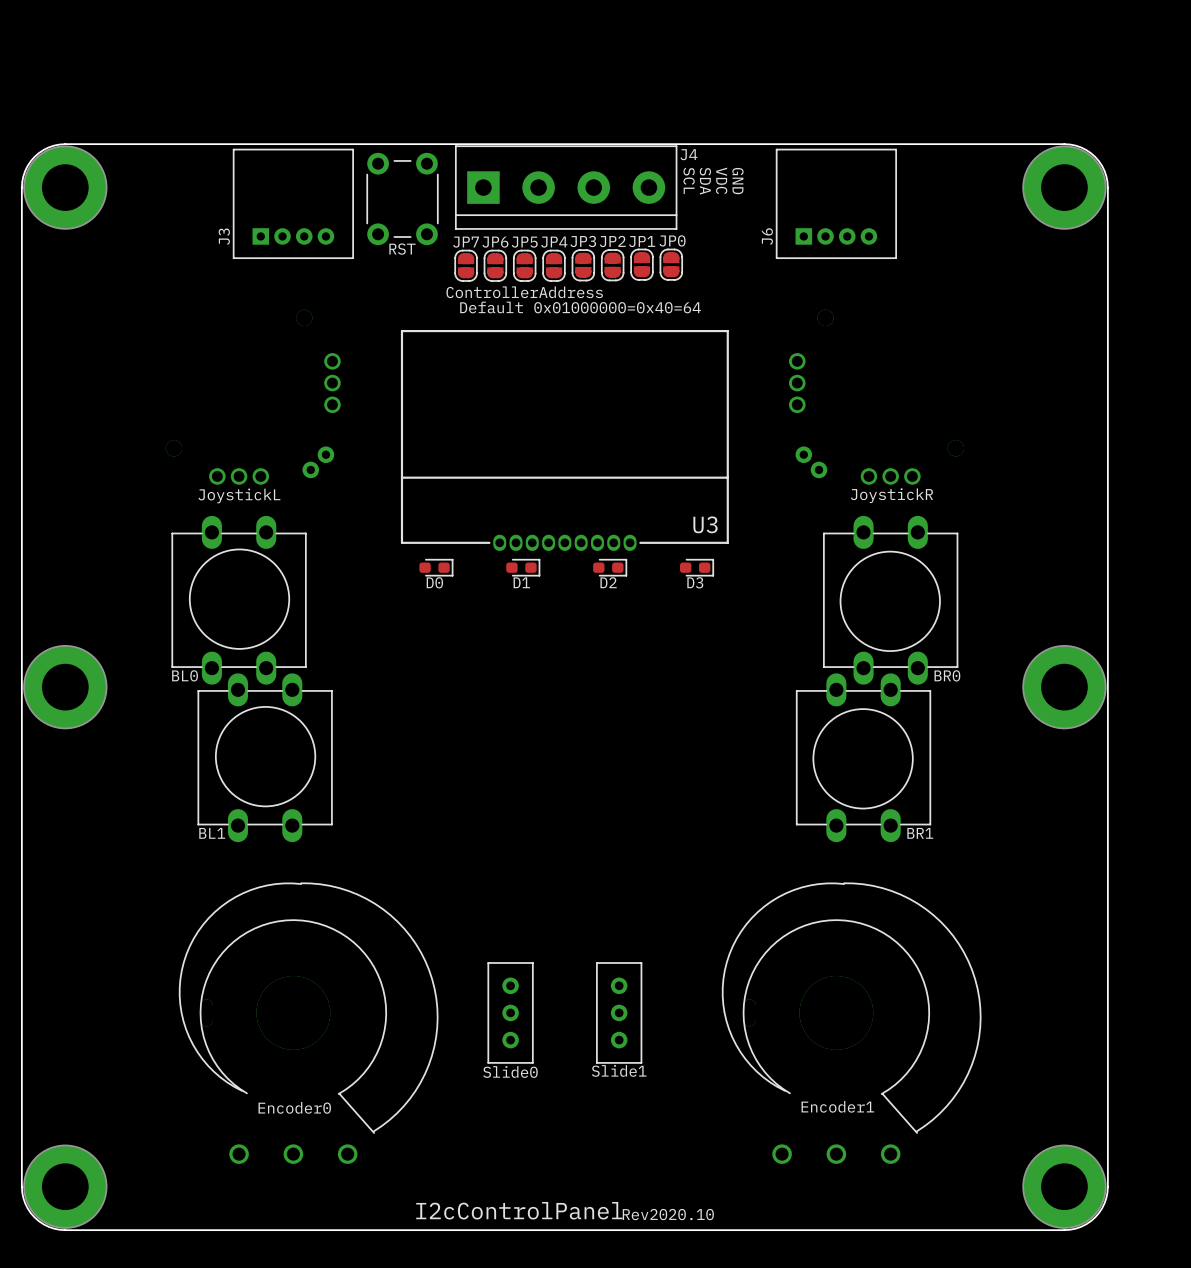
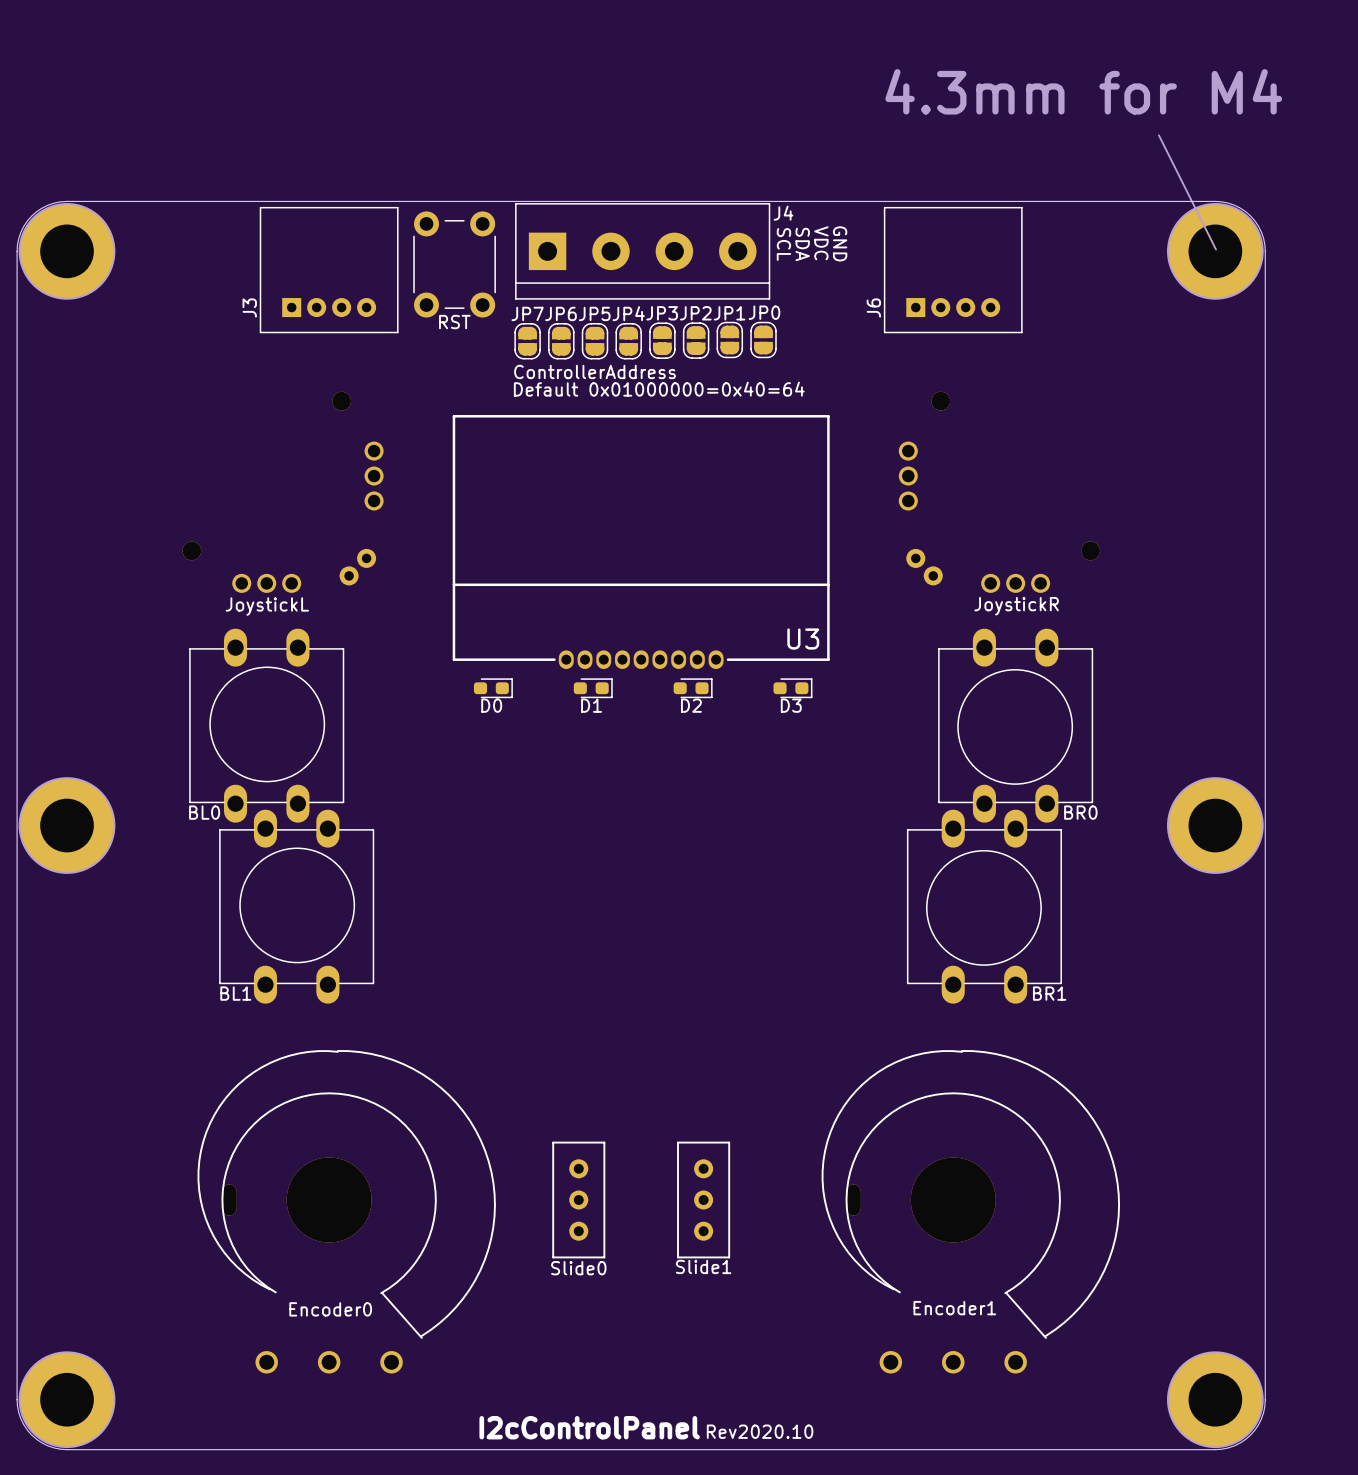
text: none -> 4.3mm for M4 (1083, 91)
line: none -> (1158, 135) (1215, 249)

